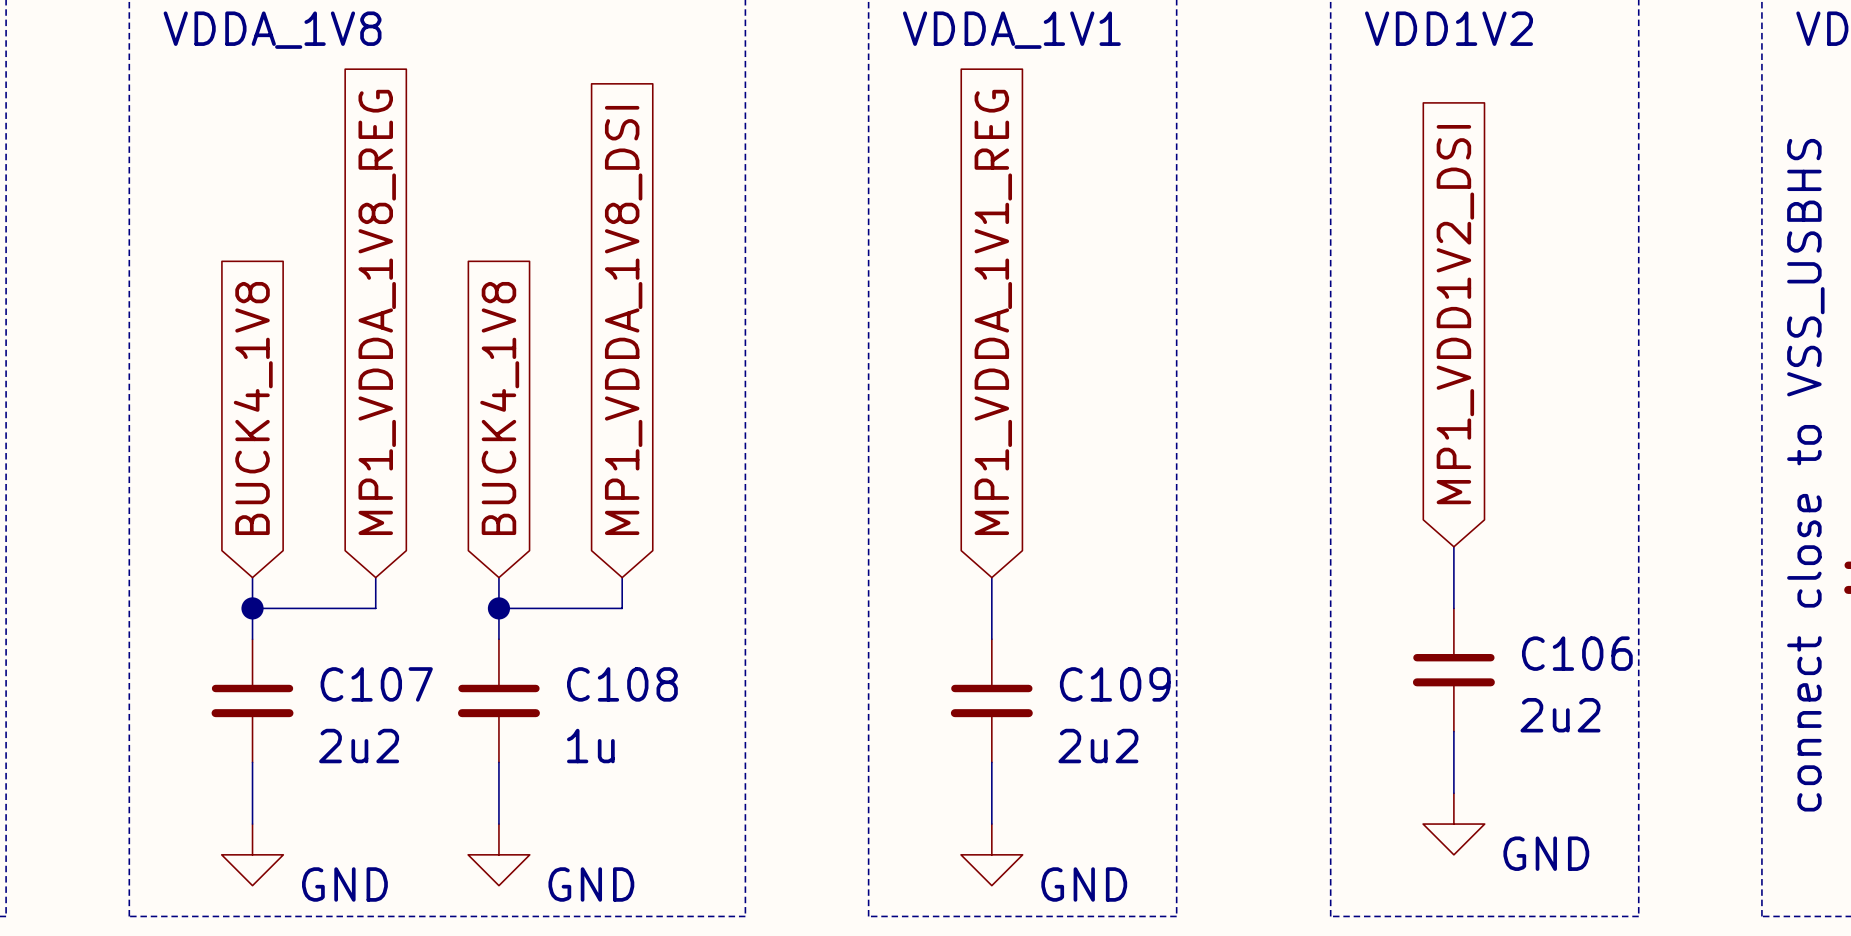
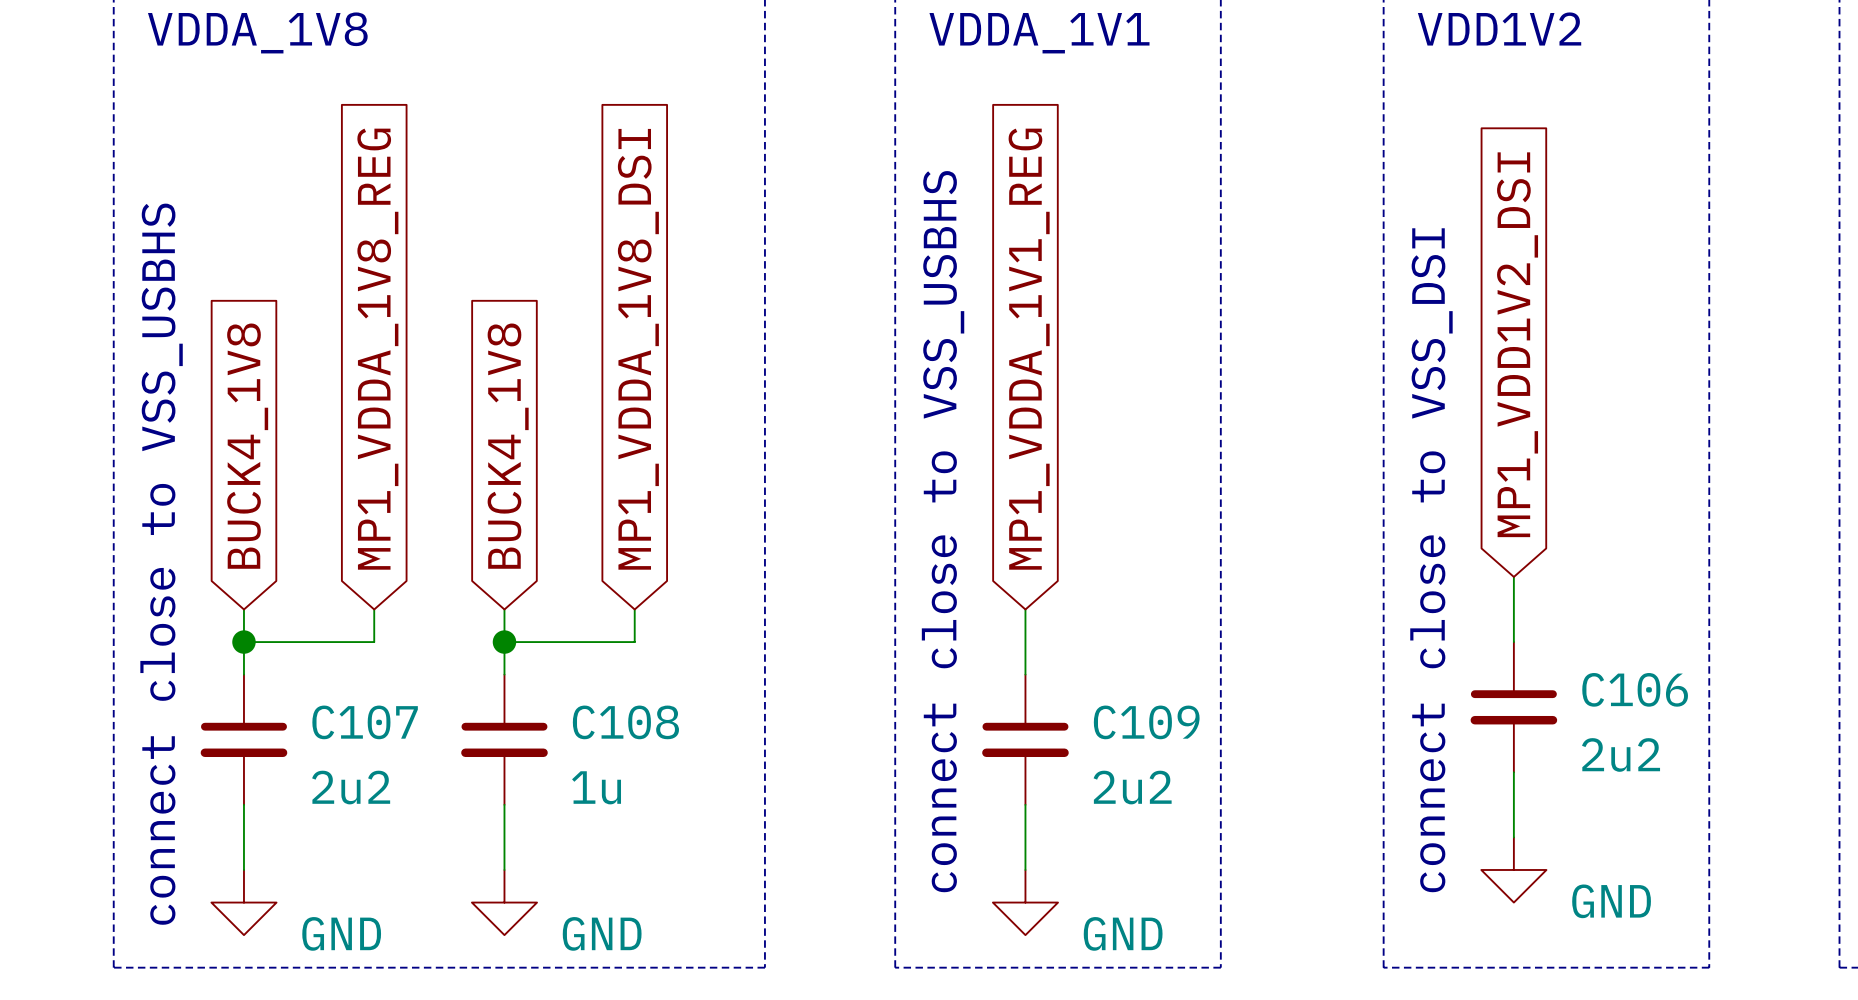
text: none -> connect close to VSS_USBHS (943, 531)
text: none -> connect close to VSS_USBHS (161, 564)
text: none -> connect close to VSS_DSI (1431, 560)

